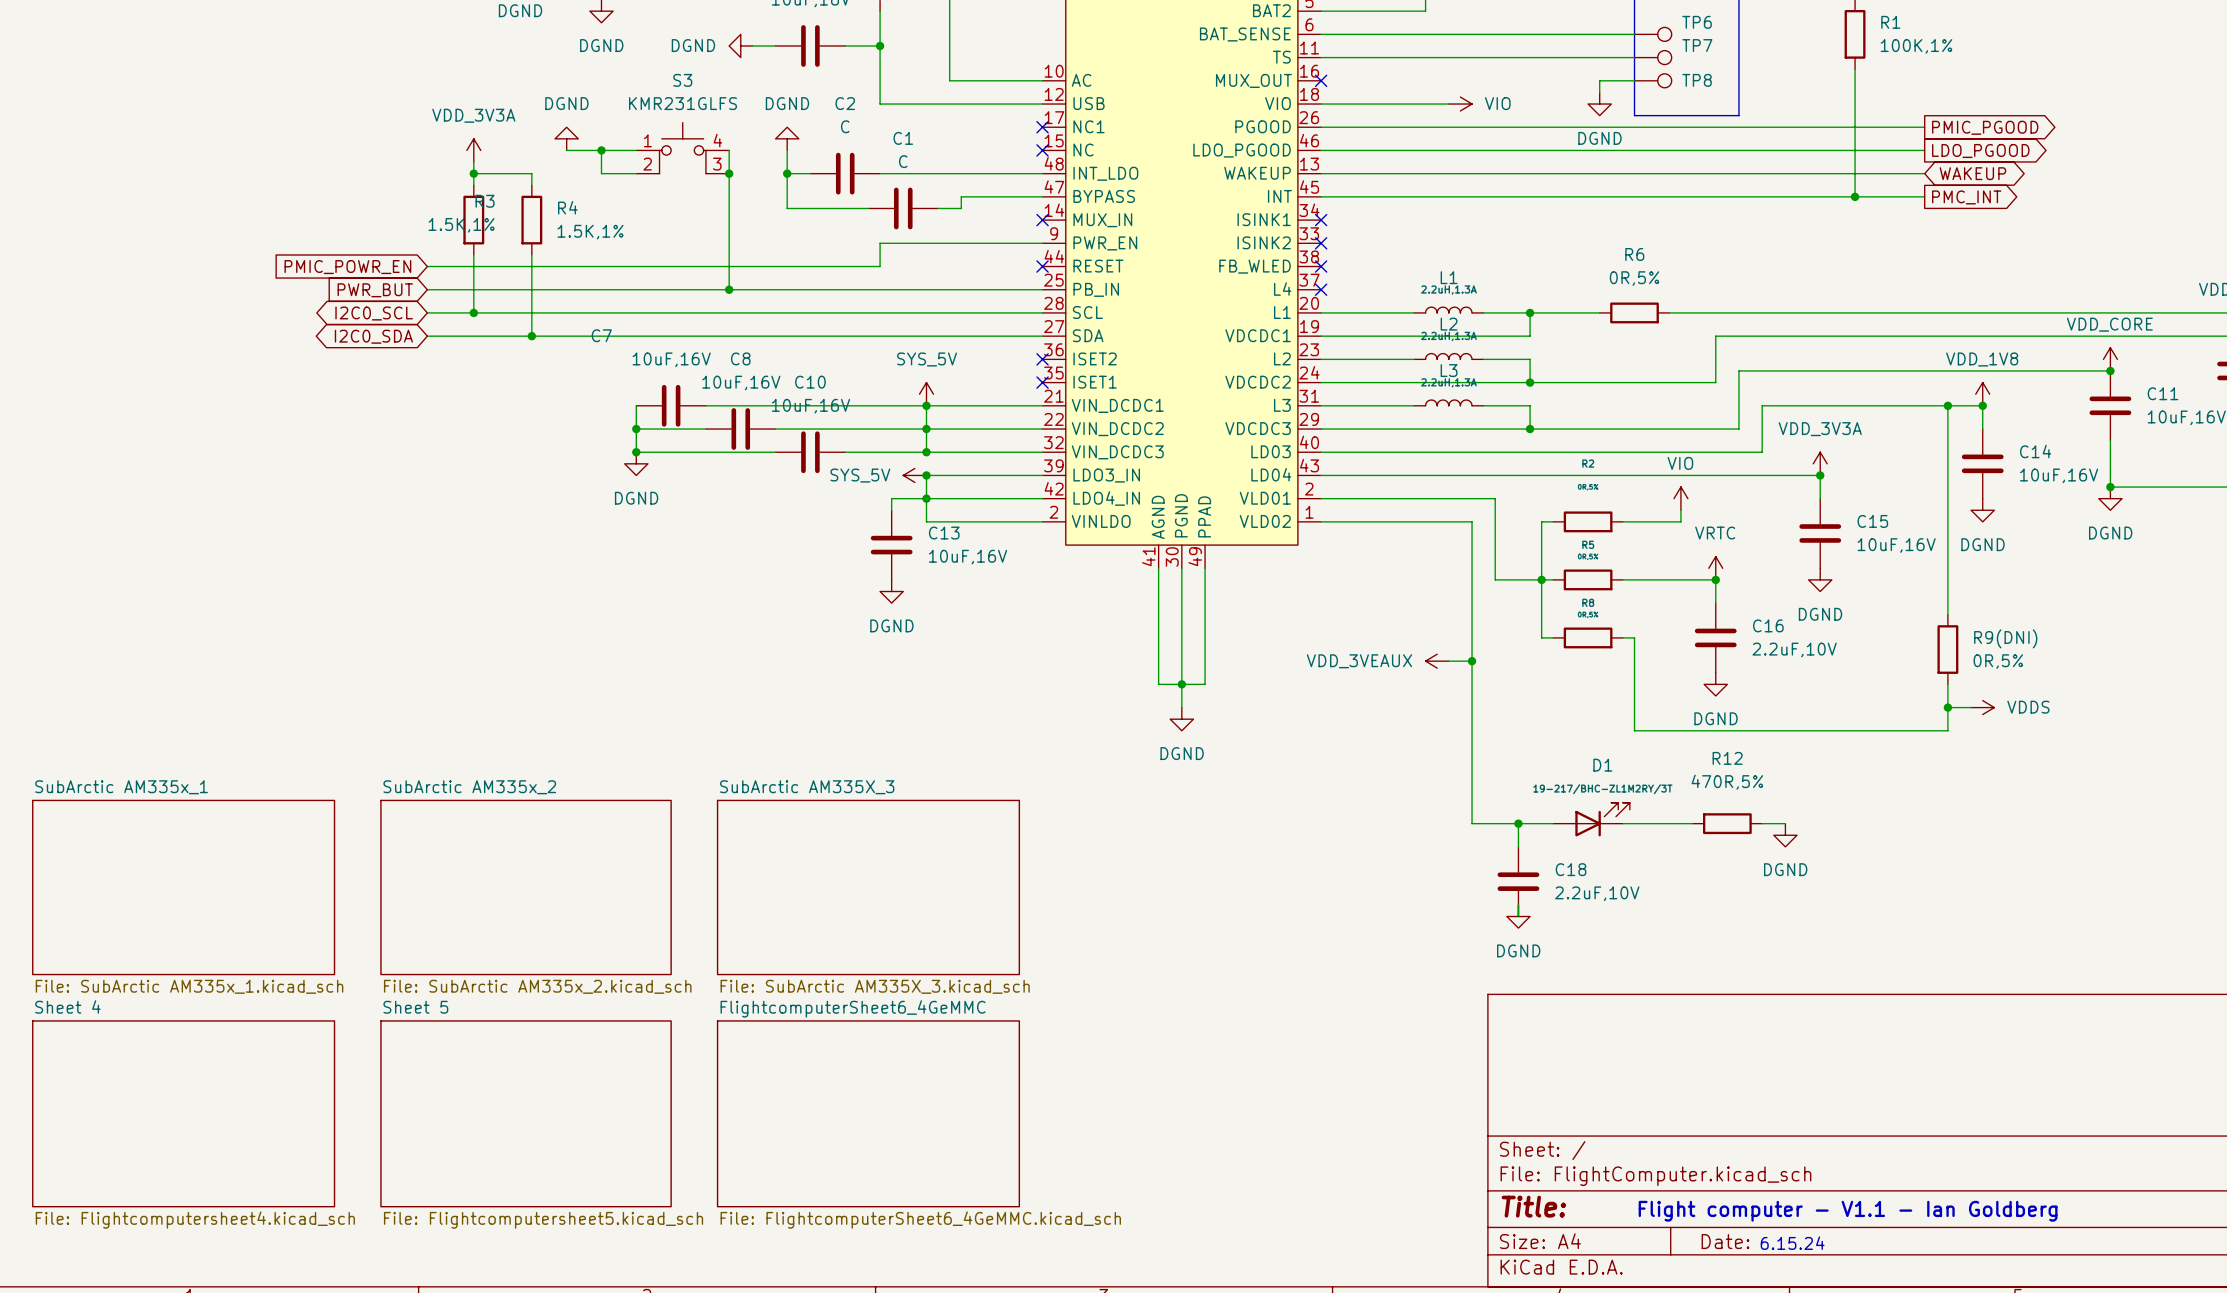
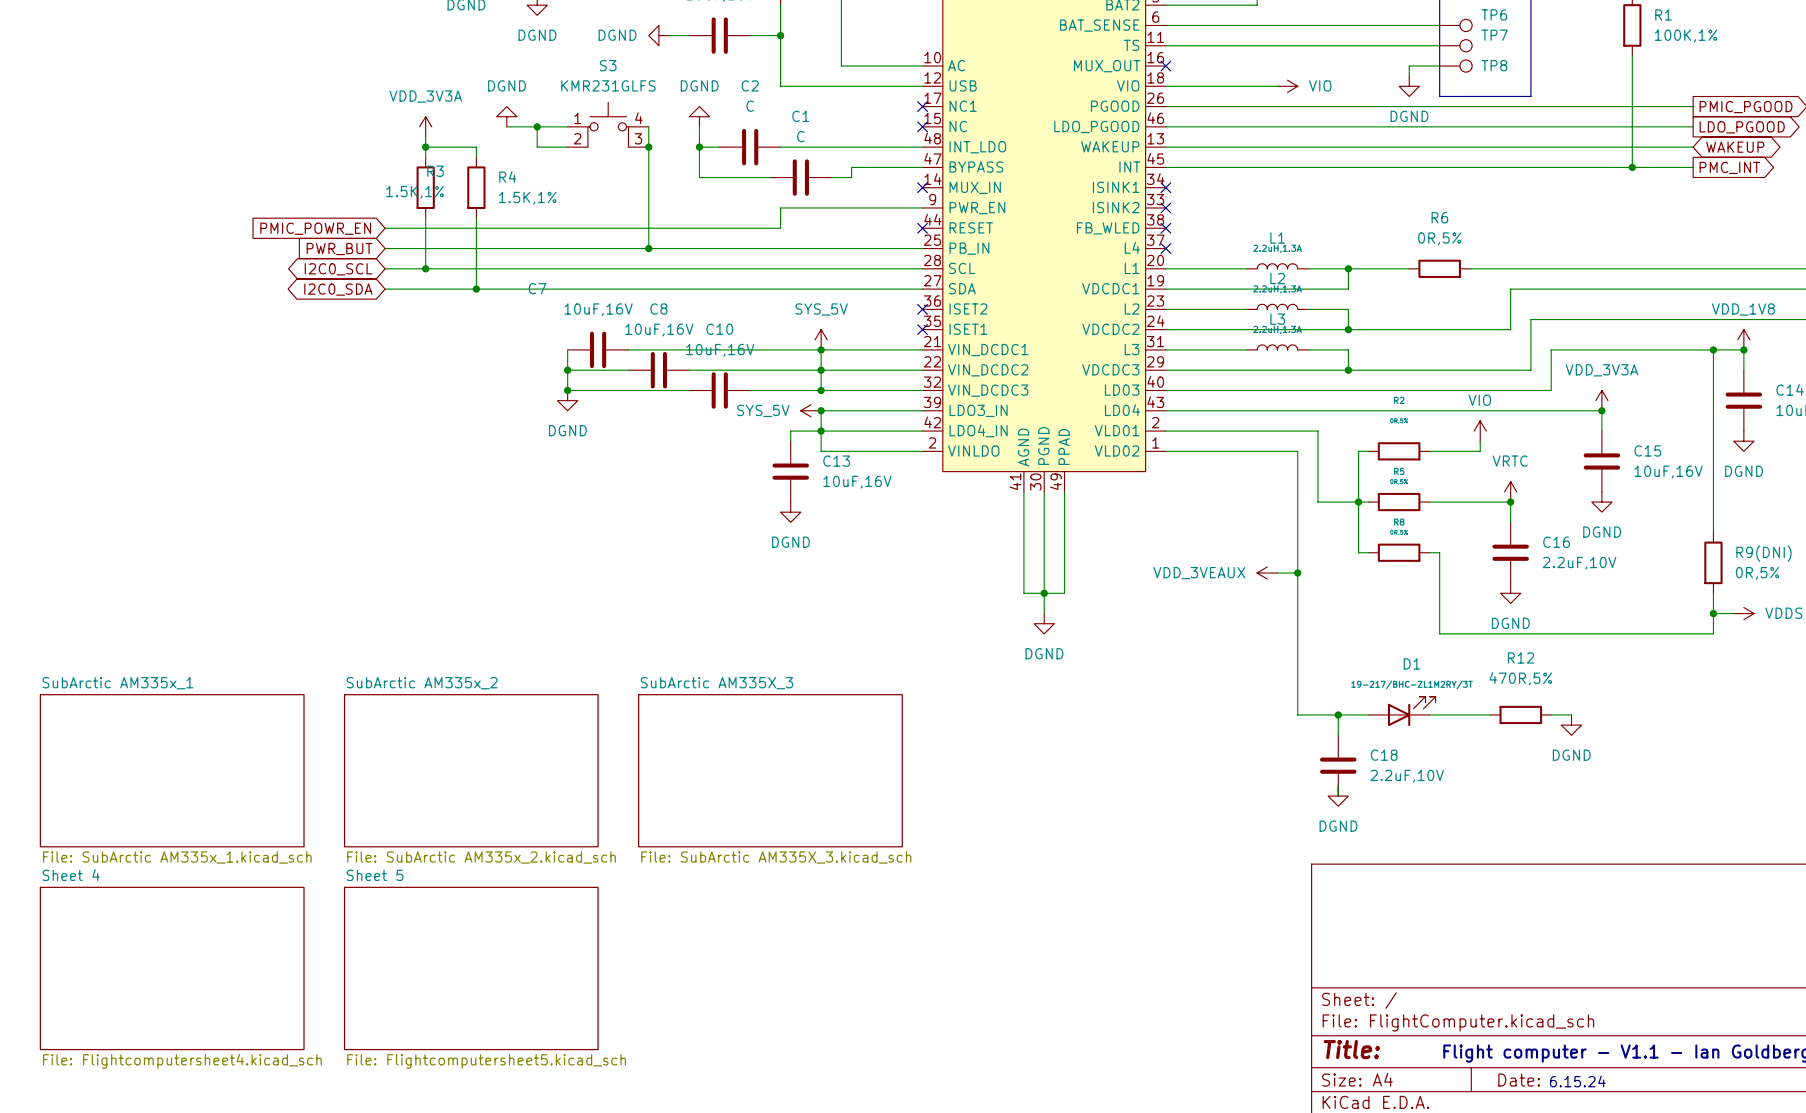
sheet FlightcomputerSheet6_4GeMMC: File: FlightcomputerSheet6_4GeMMC.kicad_sch (868, 1113) -> none

